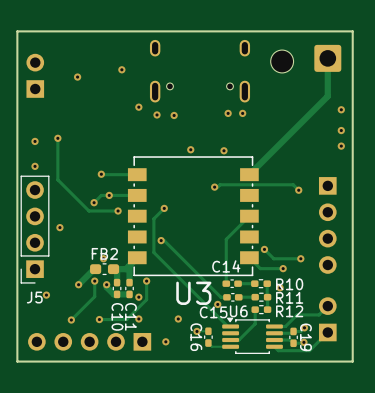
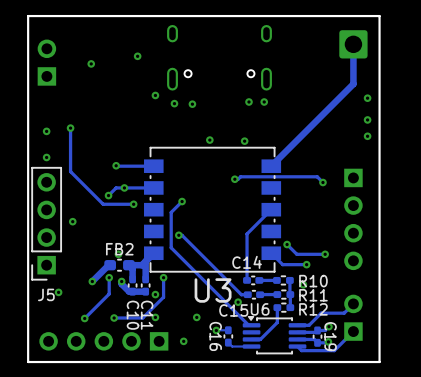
part: (282, 61) -> none

